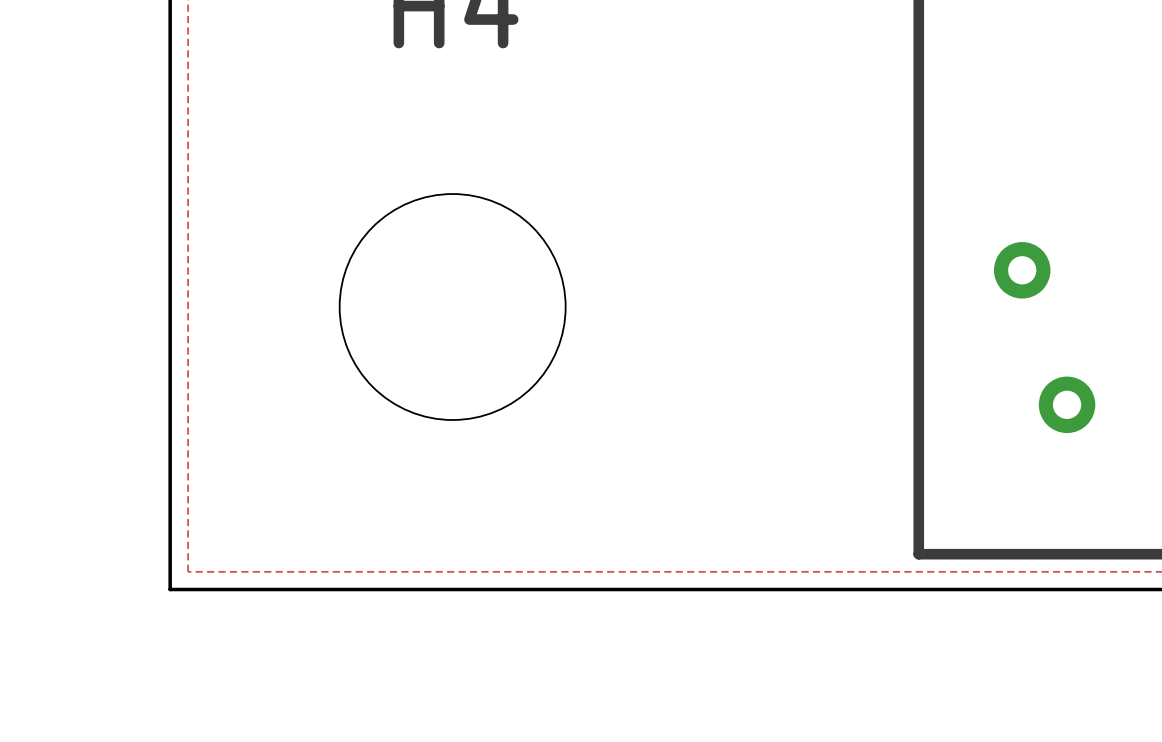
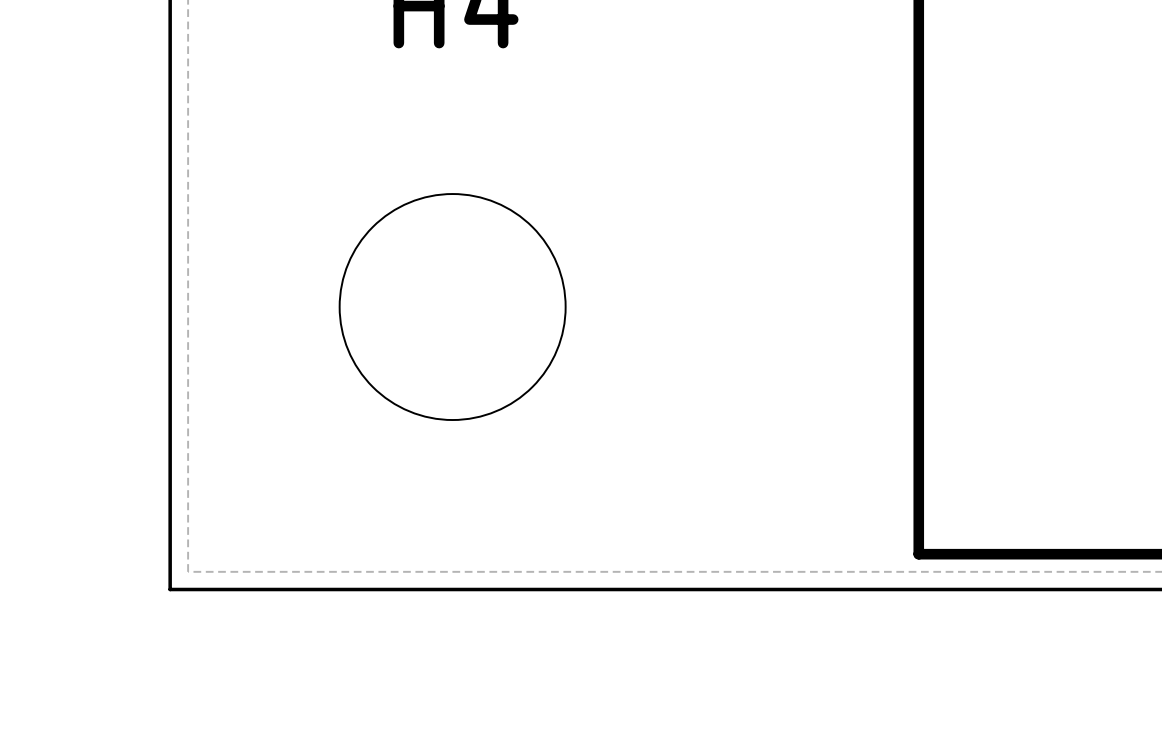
via: (1022, 270) -> none
via: (1067, 404) -> none

